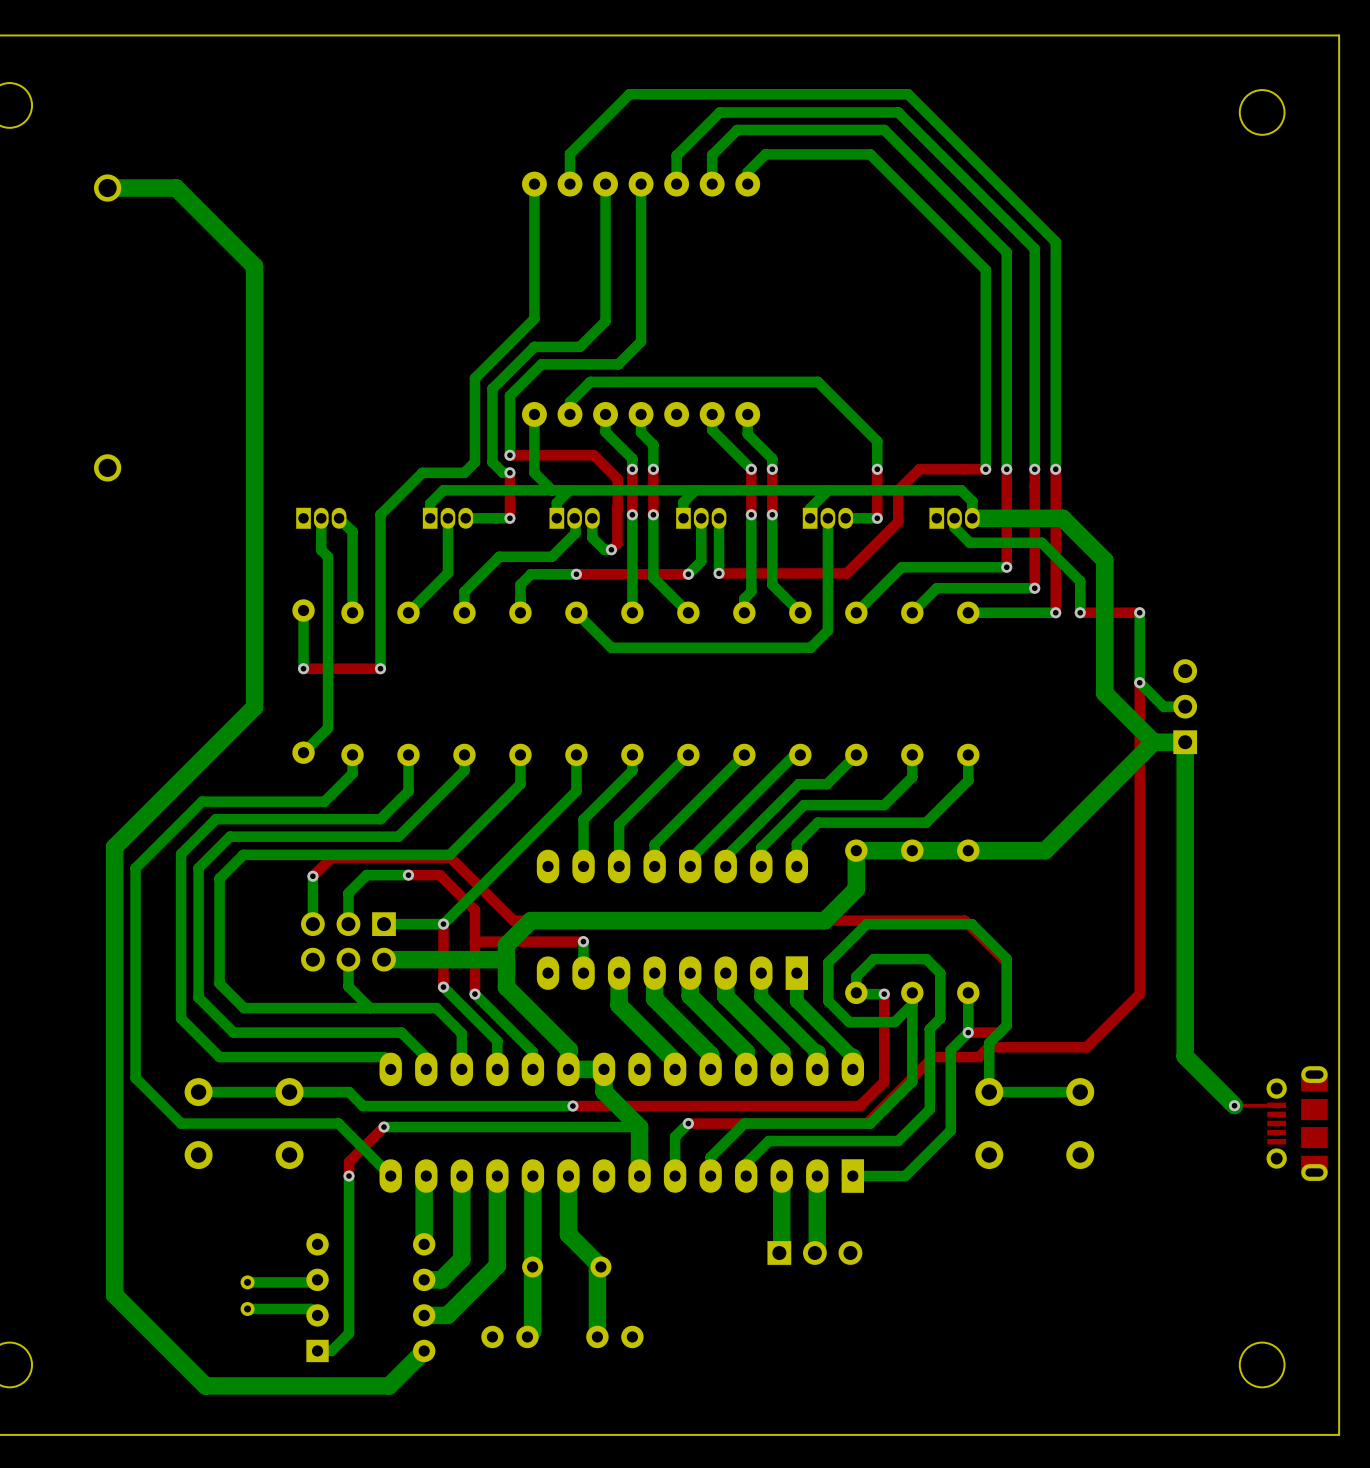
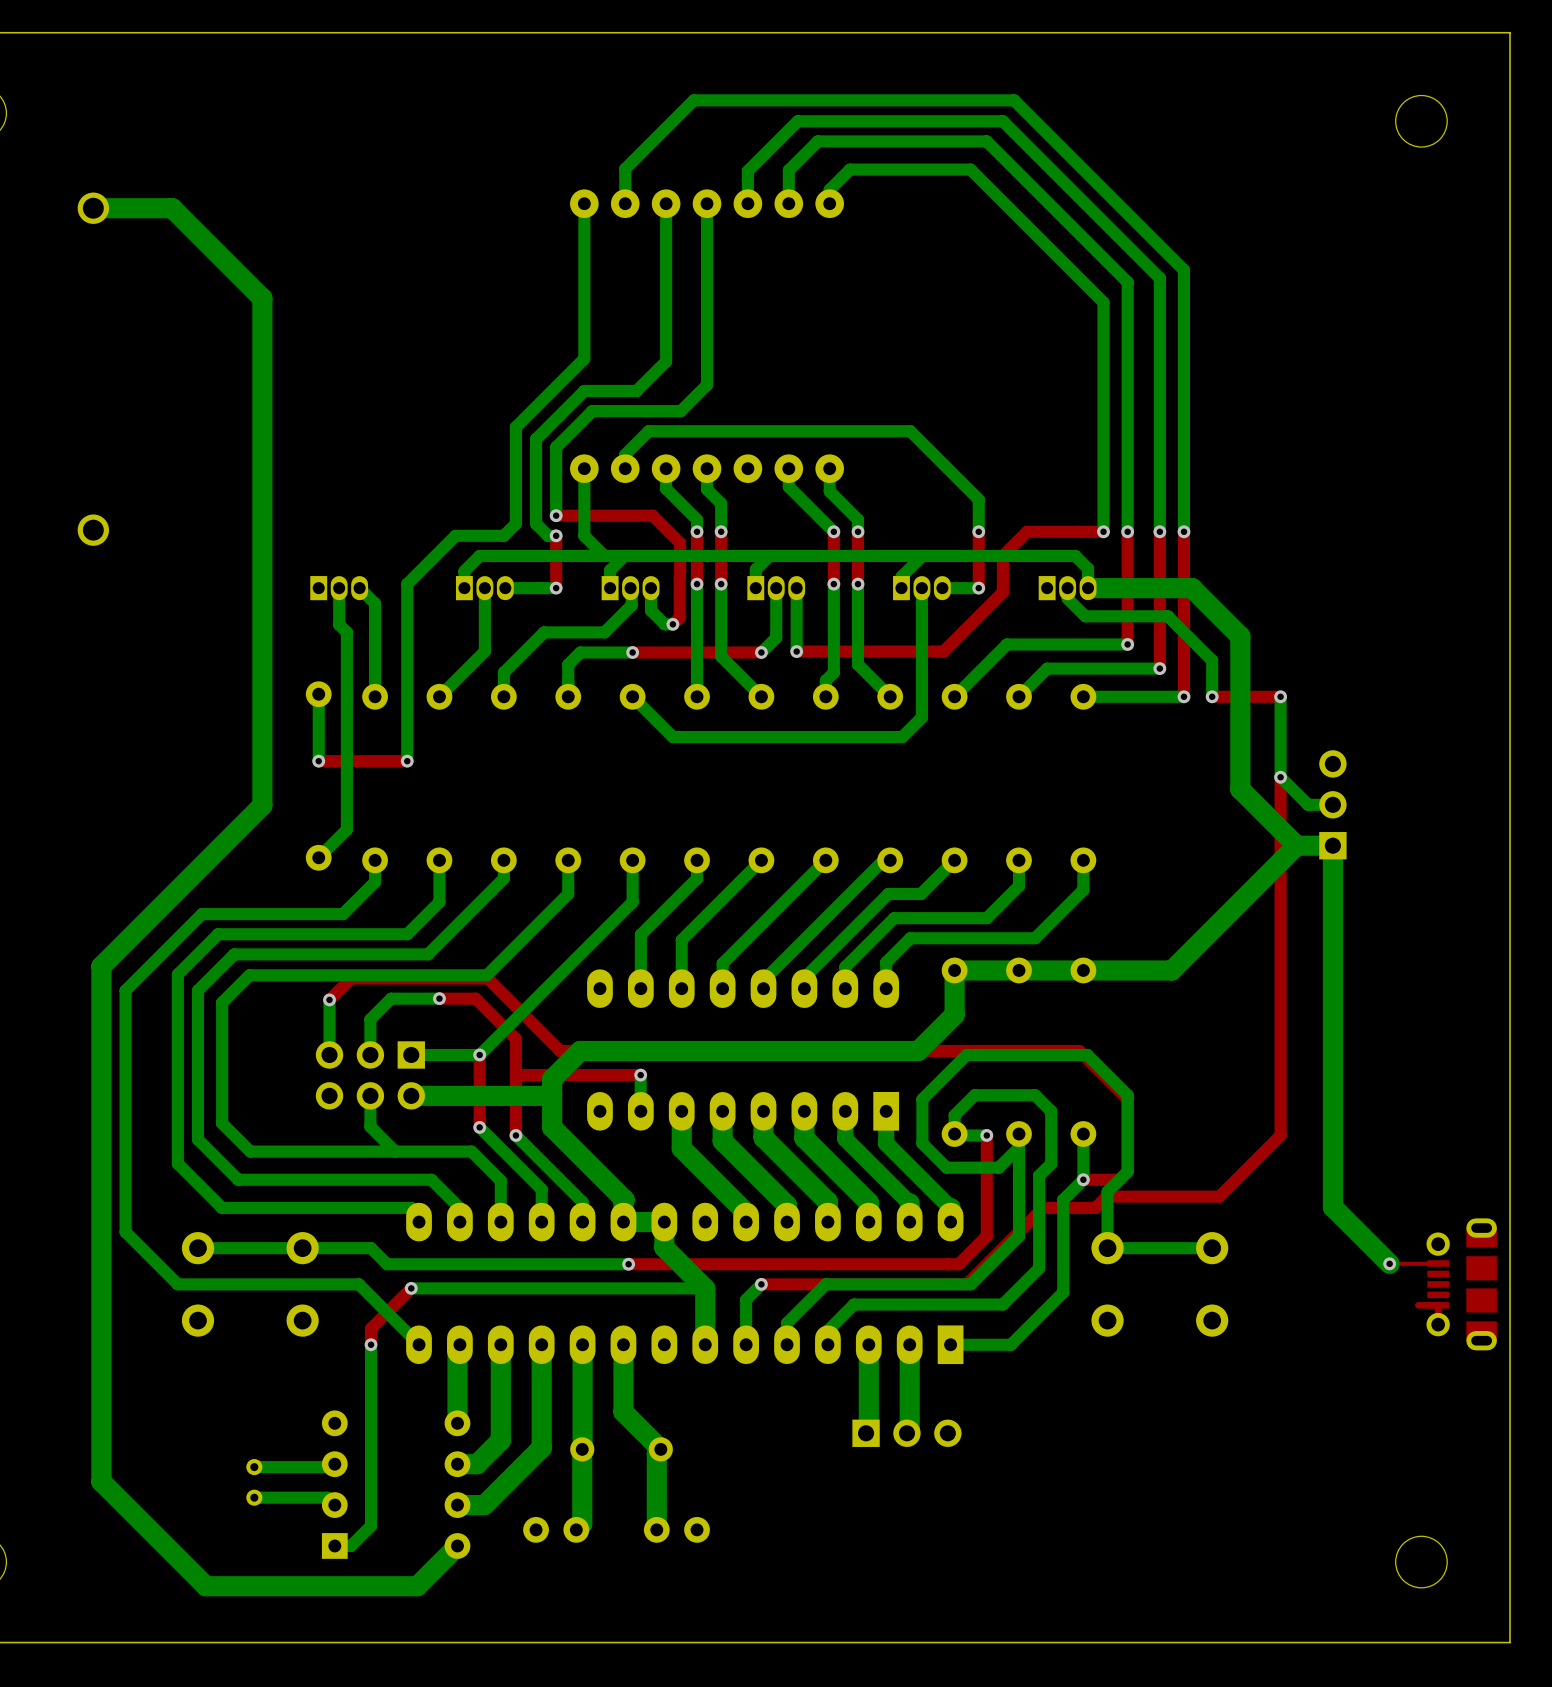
top track: none -> (1418, 1305) (1438, 1305) (1438, 1324)

